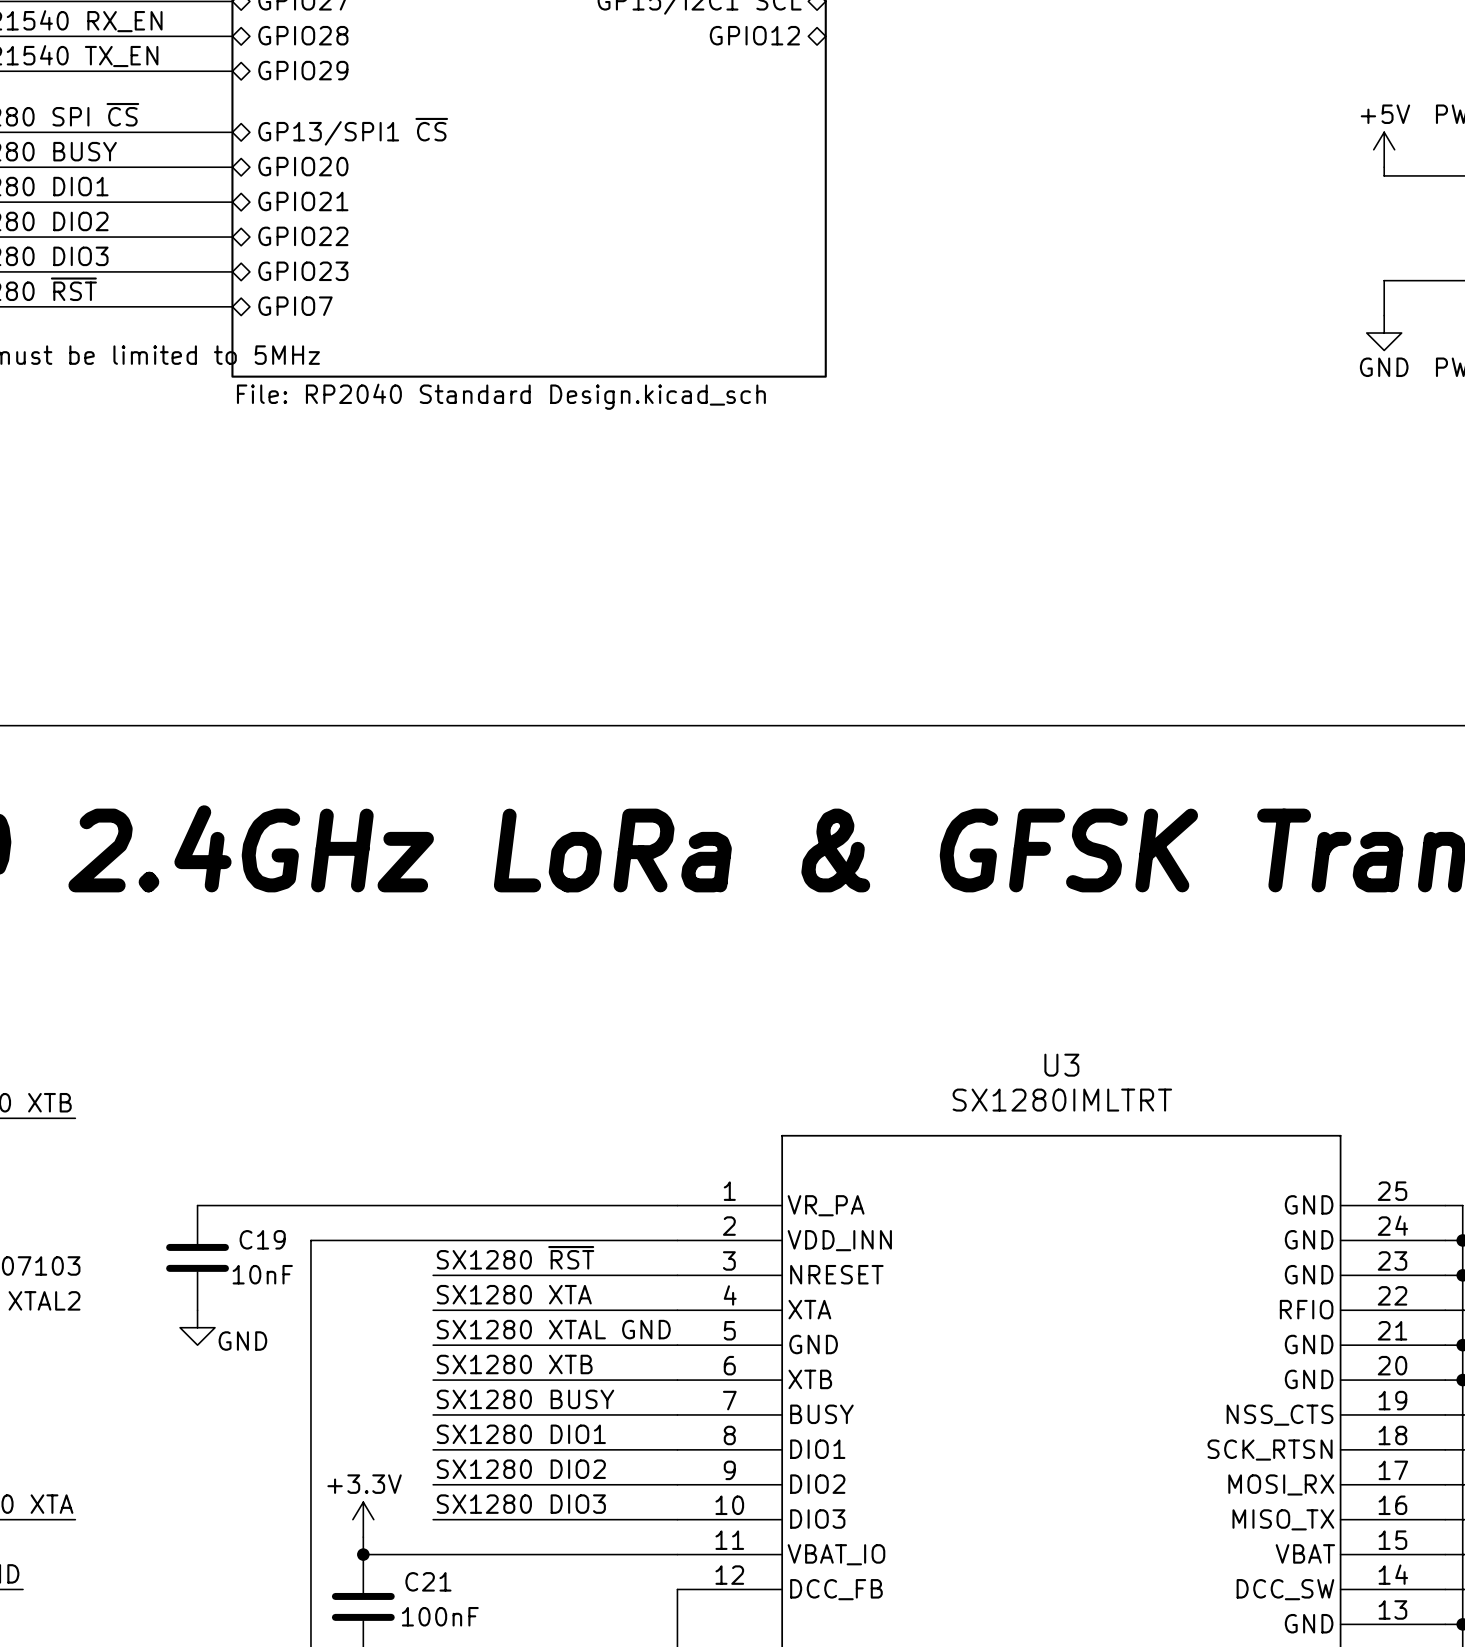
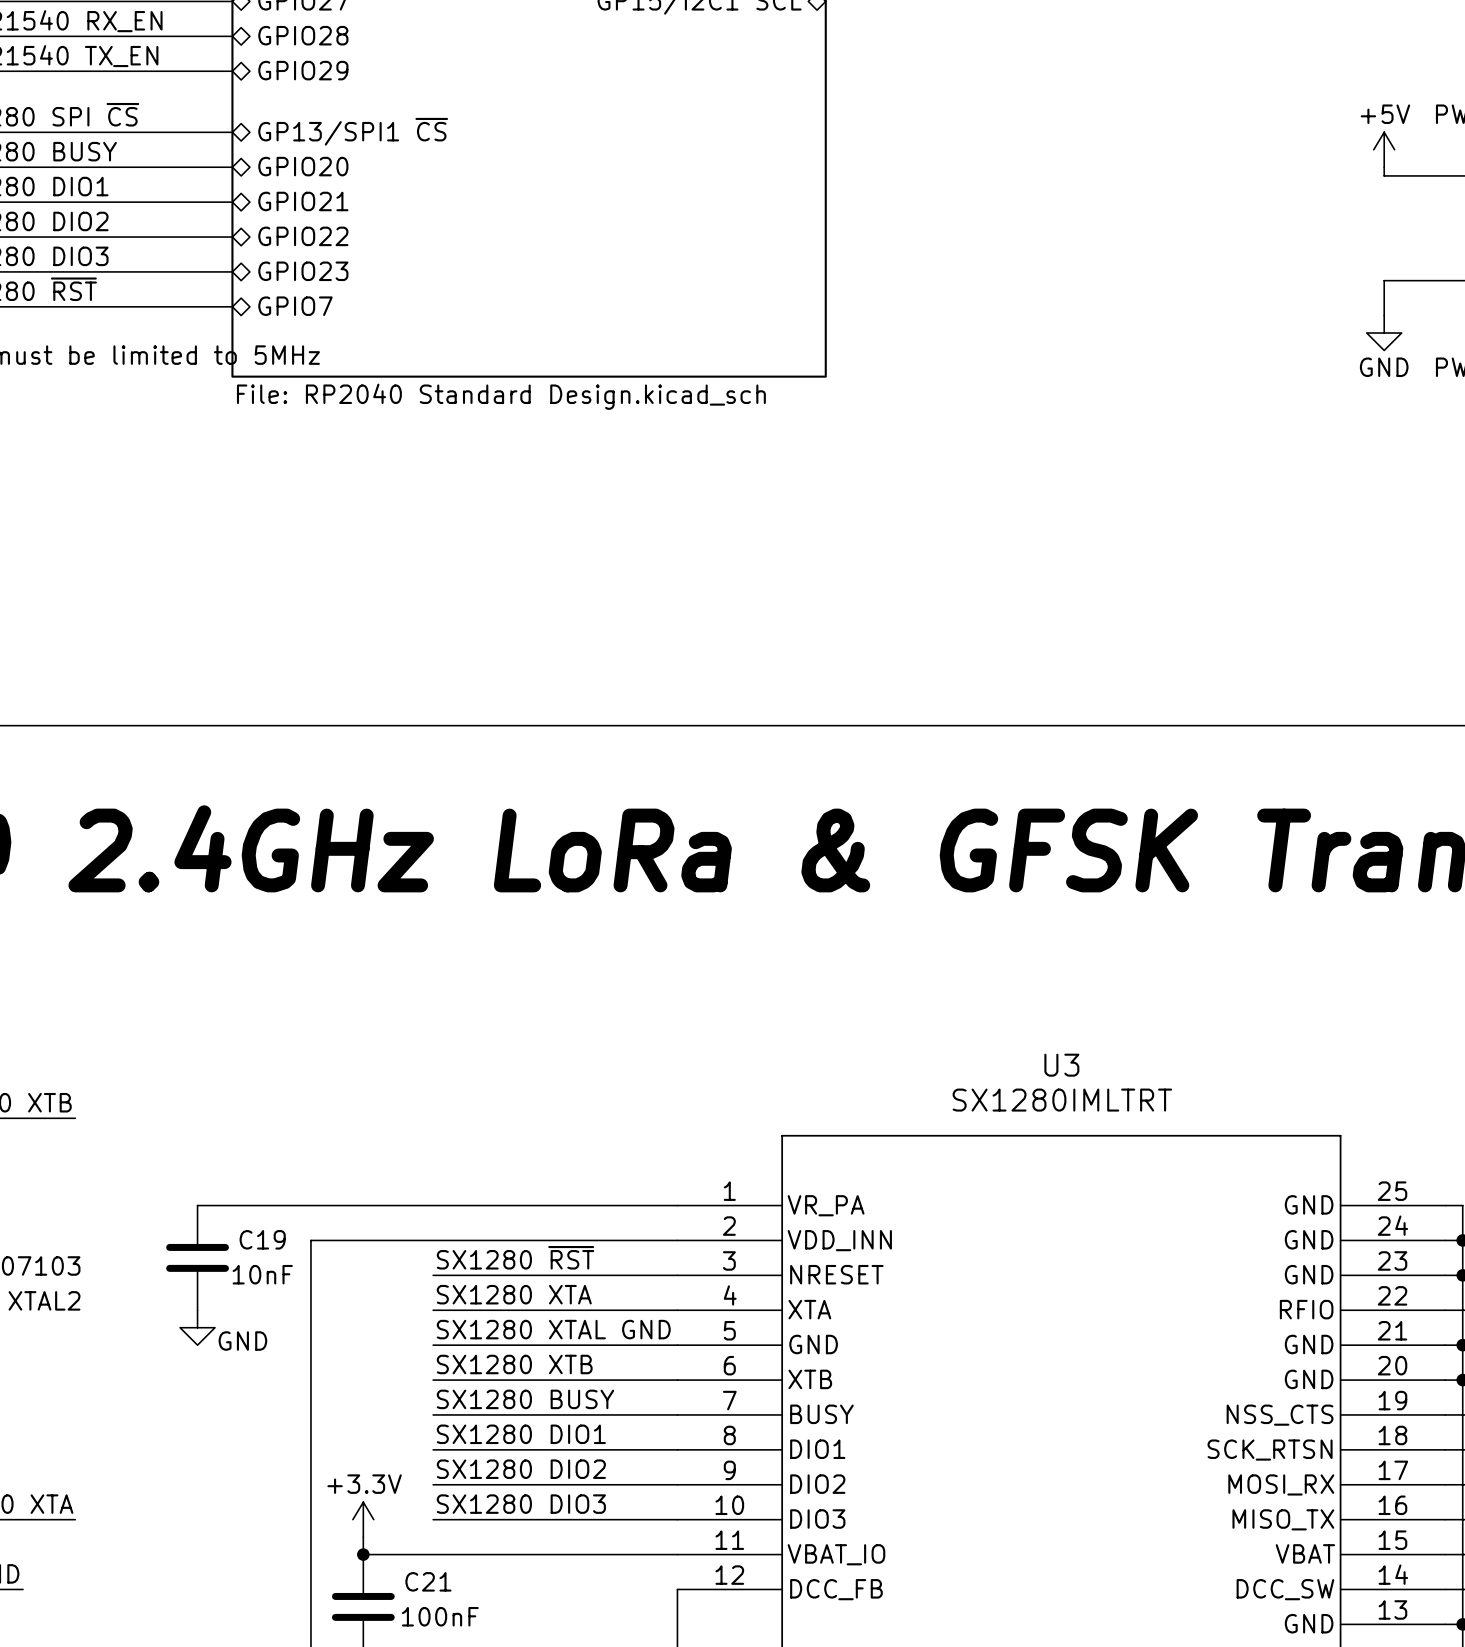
sheet pin: GPIO12 (754, 35) -> none

